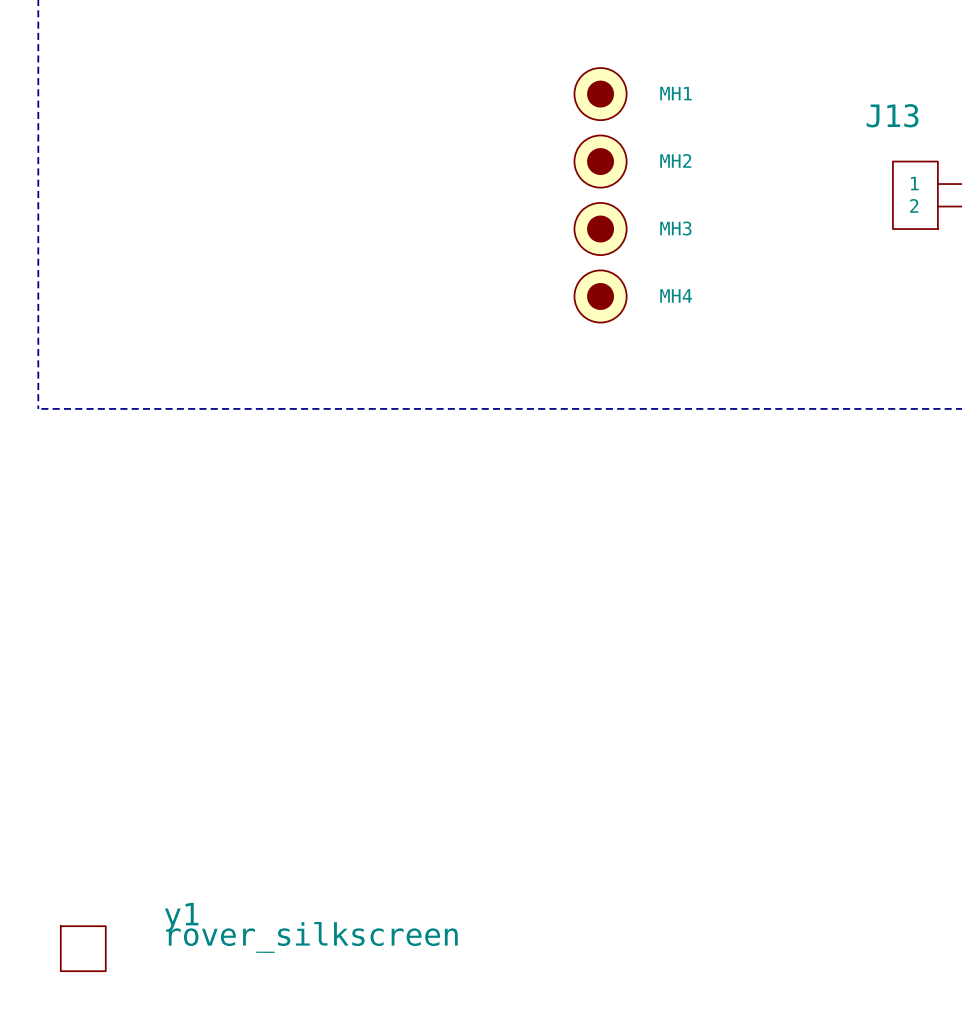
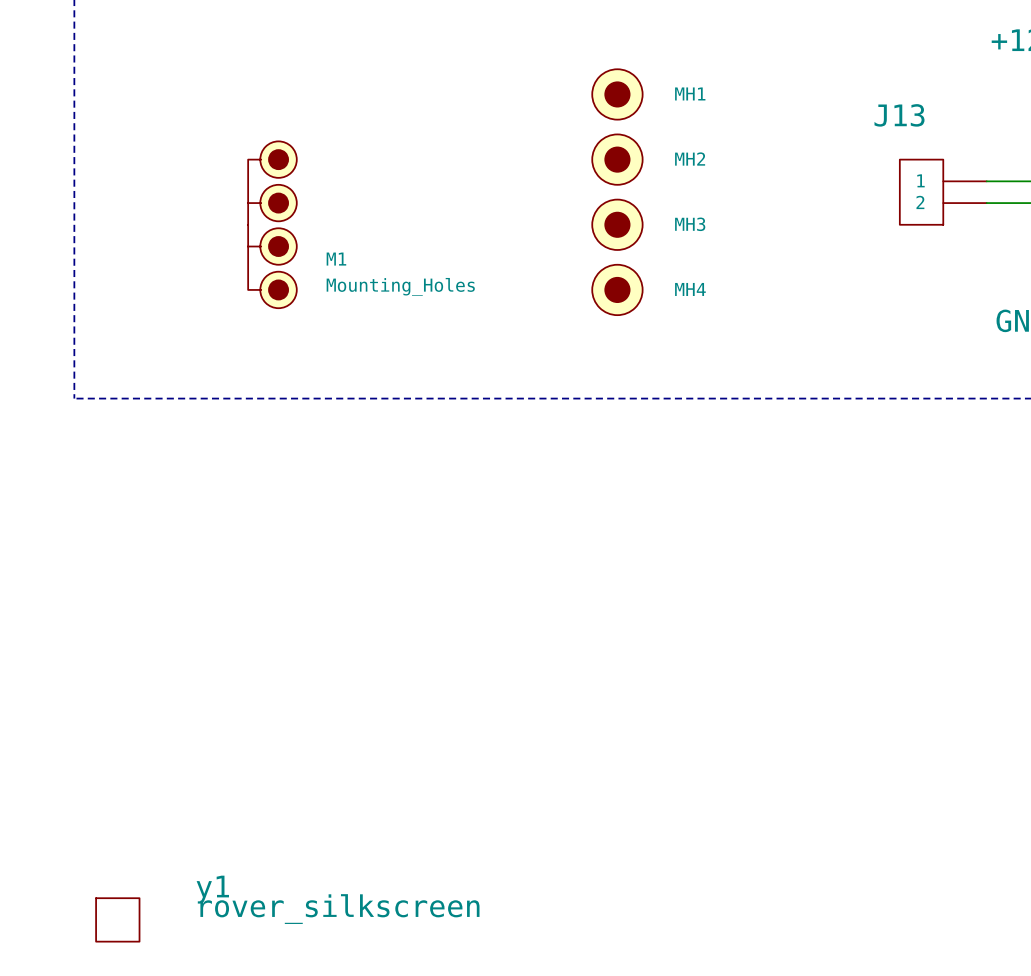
M1: none -> Mounting_Holes (272, 224)

